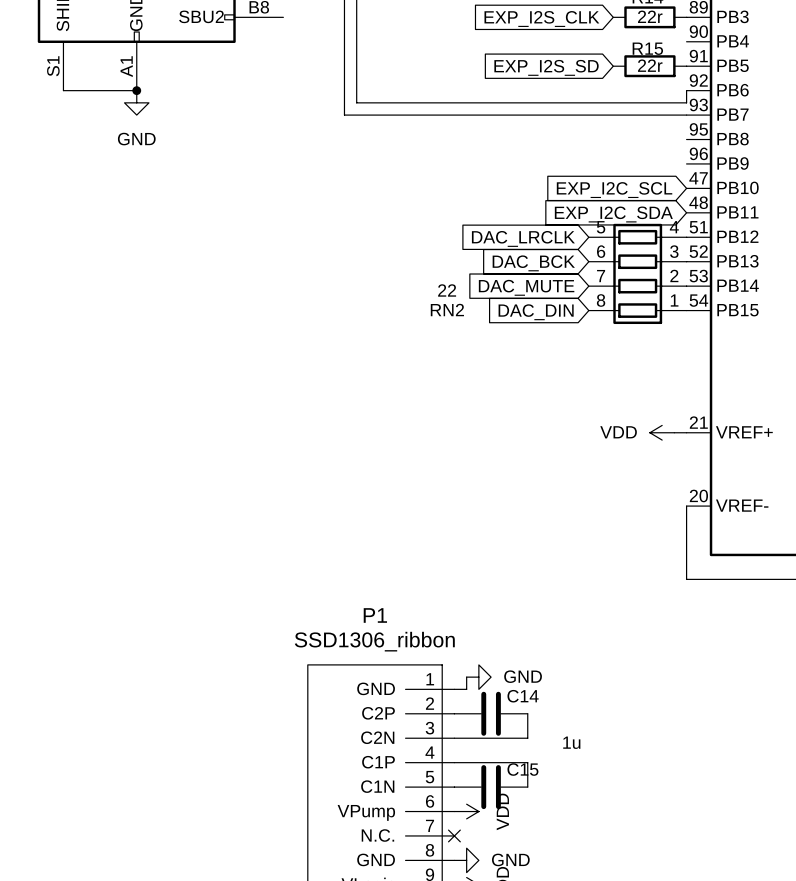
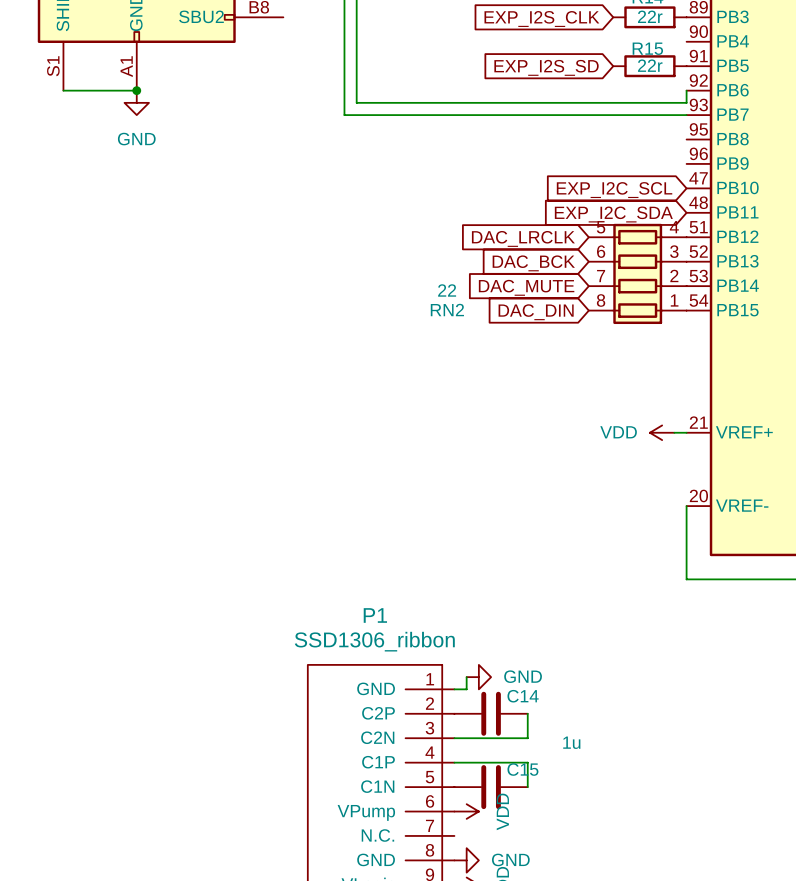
no-connect mark: (454, 835) -> none

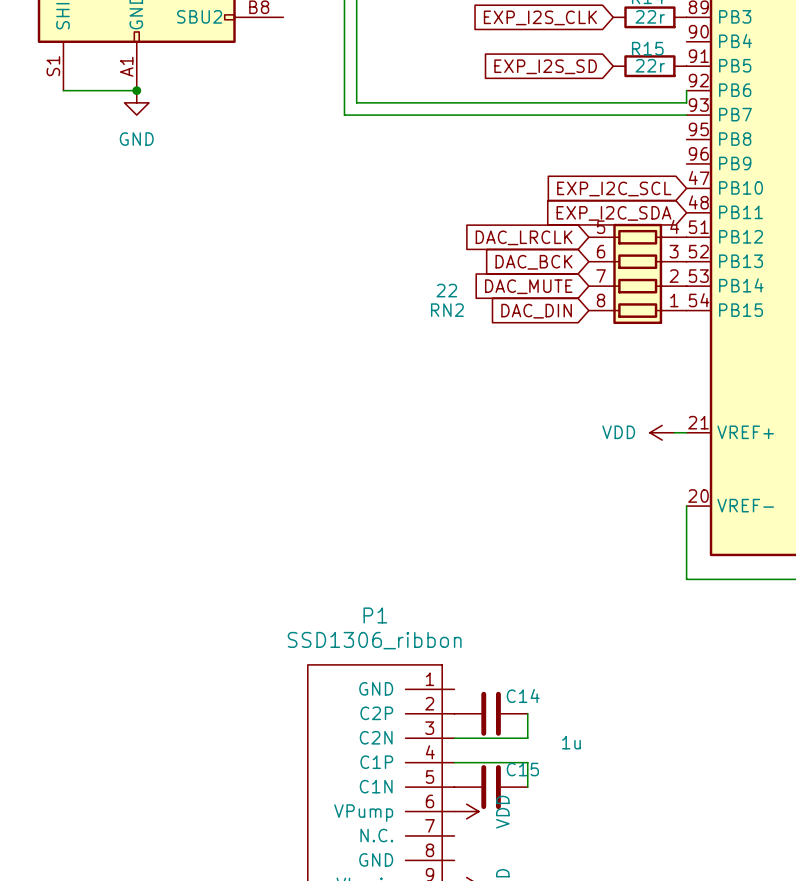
wire: (466, 677) (466, 689) (454, 689) -> none
power symbol: GND (478, 677) -> none
power symbol: GND (466, 860) -> none

